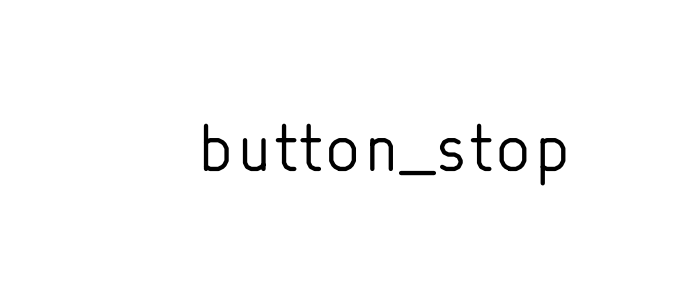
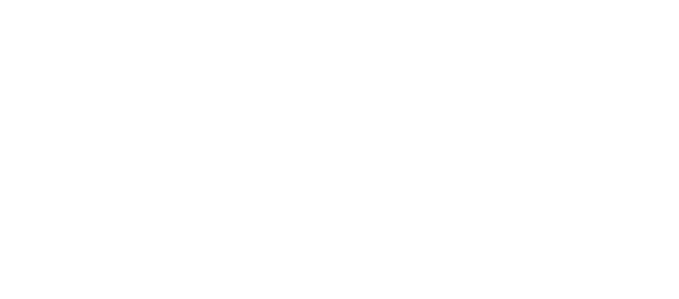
label: button_stop (384, 154) -> none

